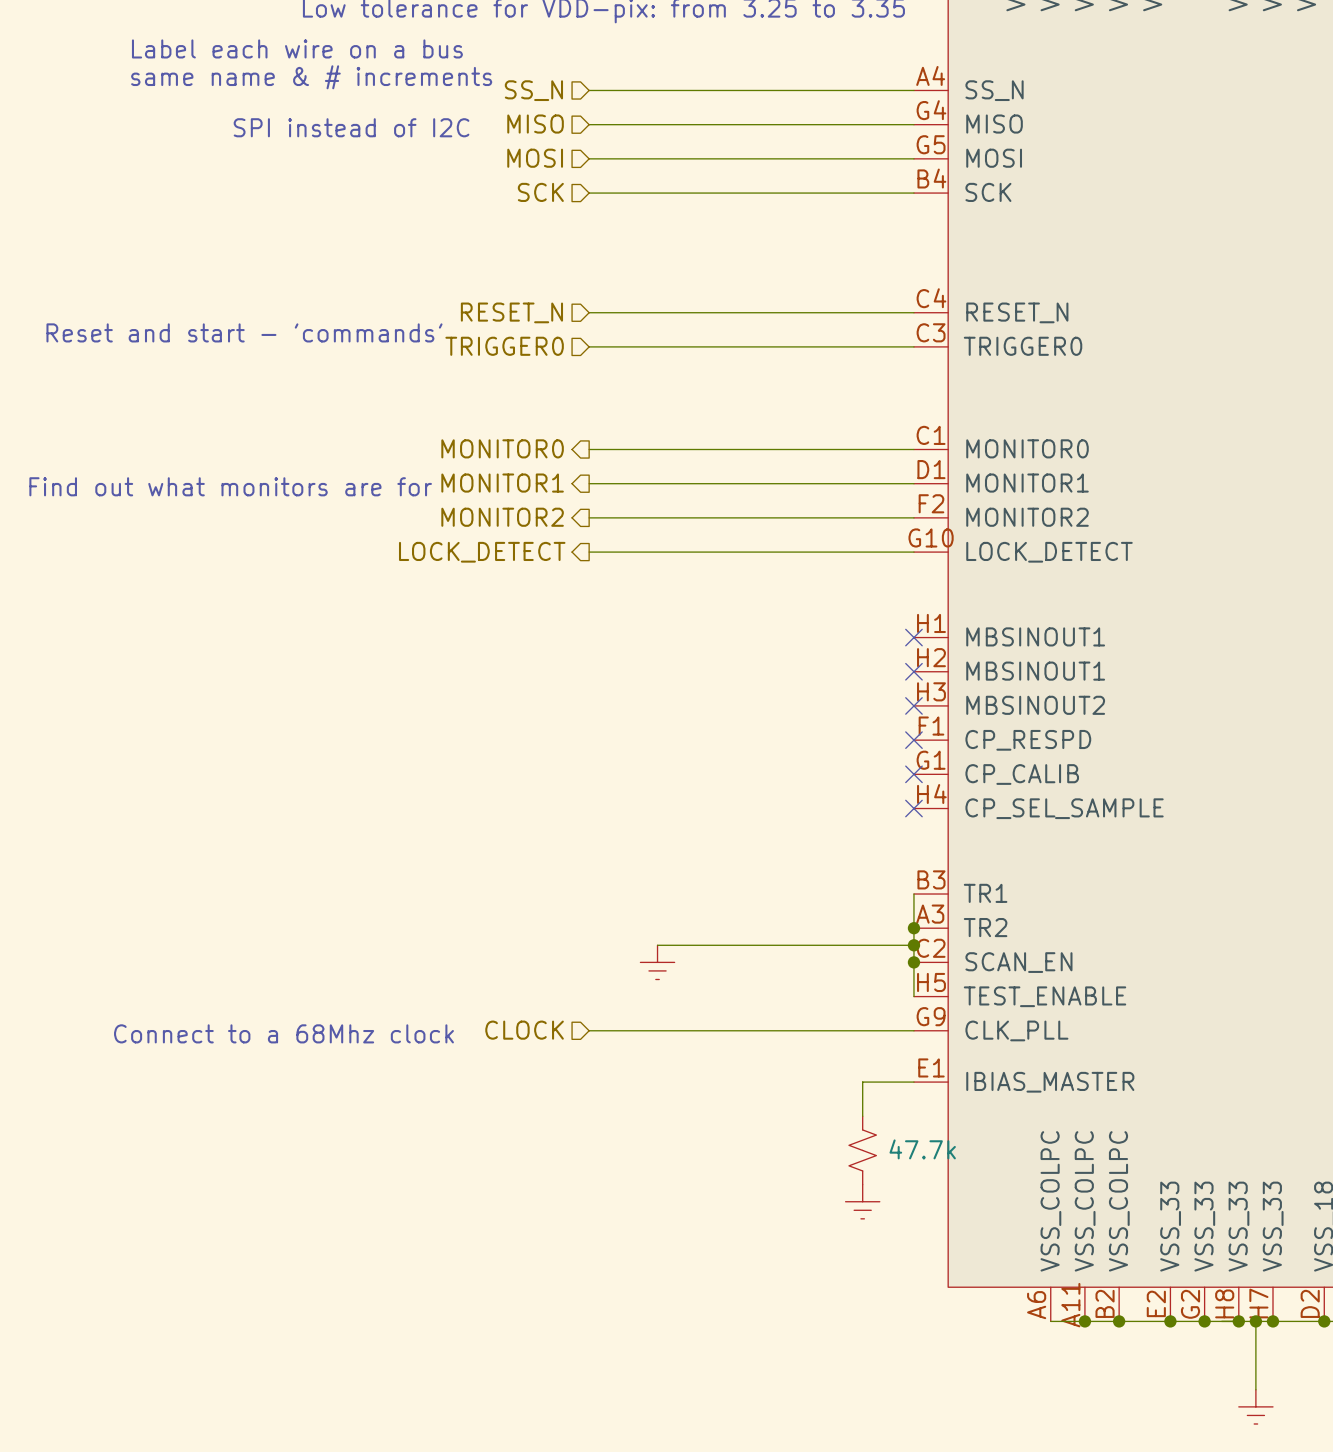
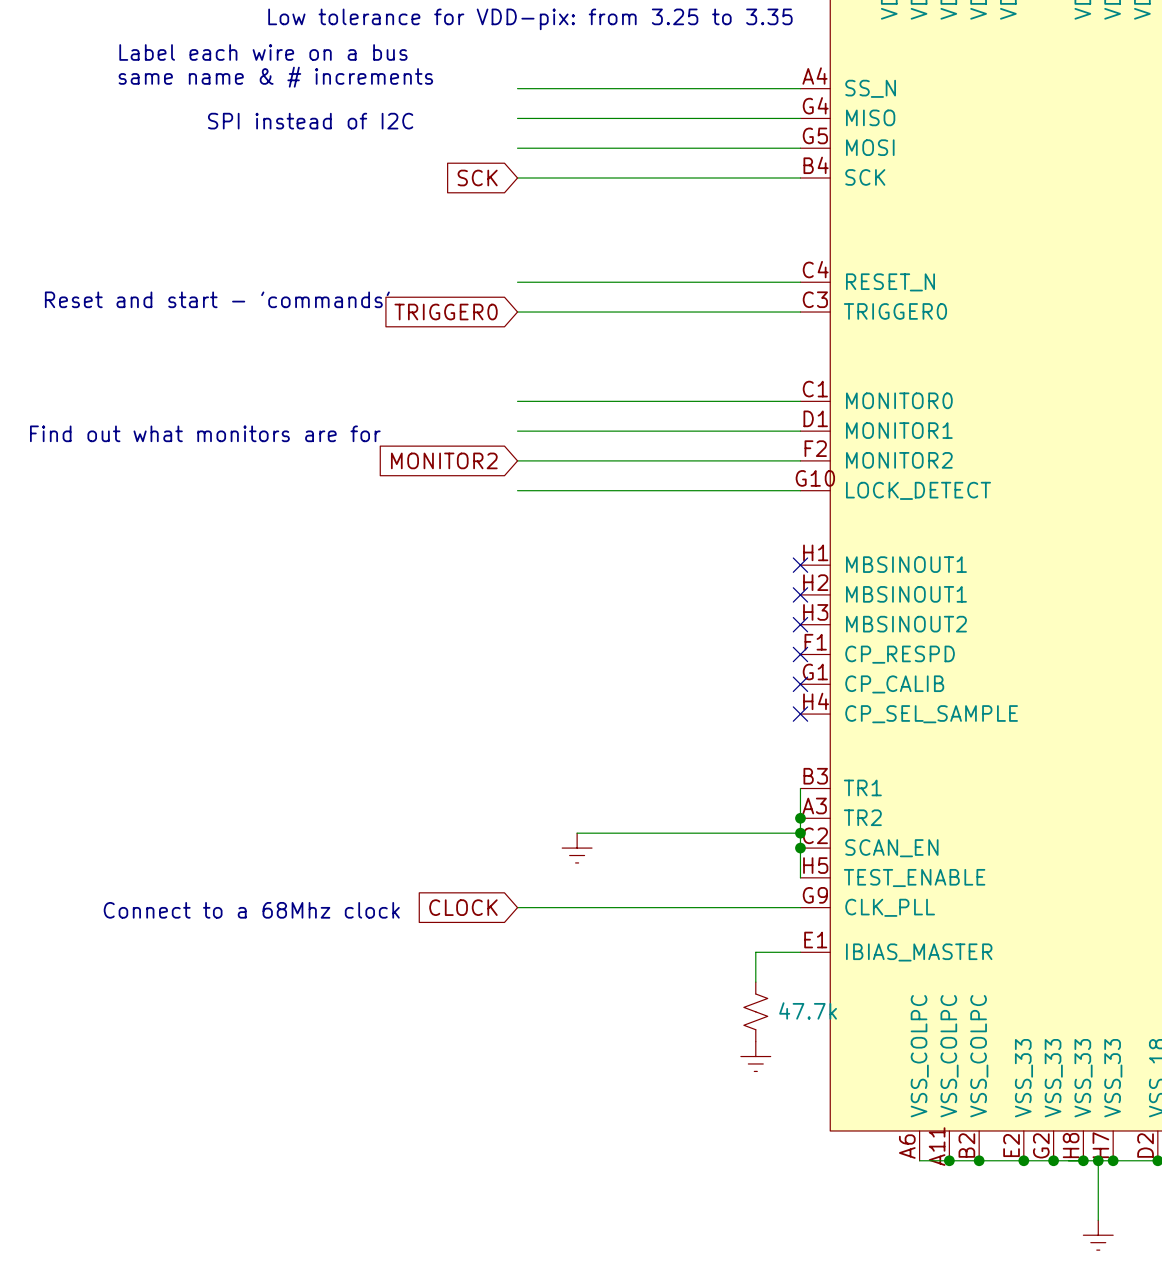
hierarchical label: SS_N (533, 90) -> none
hierarchical label: MISO (535, 124) -> none
hierarchical label: MOSI (535, 158) -> none
hierarchical label: SCK (540, 192) -> none
global label: none -> SCK (477, 178)
hierarchical label: RESET_N (511, 312) -> none
hierarchical label: TRIGGER0 (504, 346) -> none
global label: none -> TRIGGER0 (446, 312)
hierarchical label: MONITOR0 (502, 448) -> none
hierarchical label: MONITOR1 (502, 483) -> none
hierarchical label: MONITOR2 (502, 517) -> none
global label: none -> MONITOR2 (444, 460)
hierarchical label: LOCK_DETECT (482, 552) -> none
hierarchical label: CLOCK (524, 1030) -> none
global label: none -> CLOCK (463, 907)

